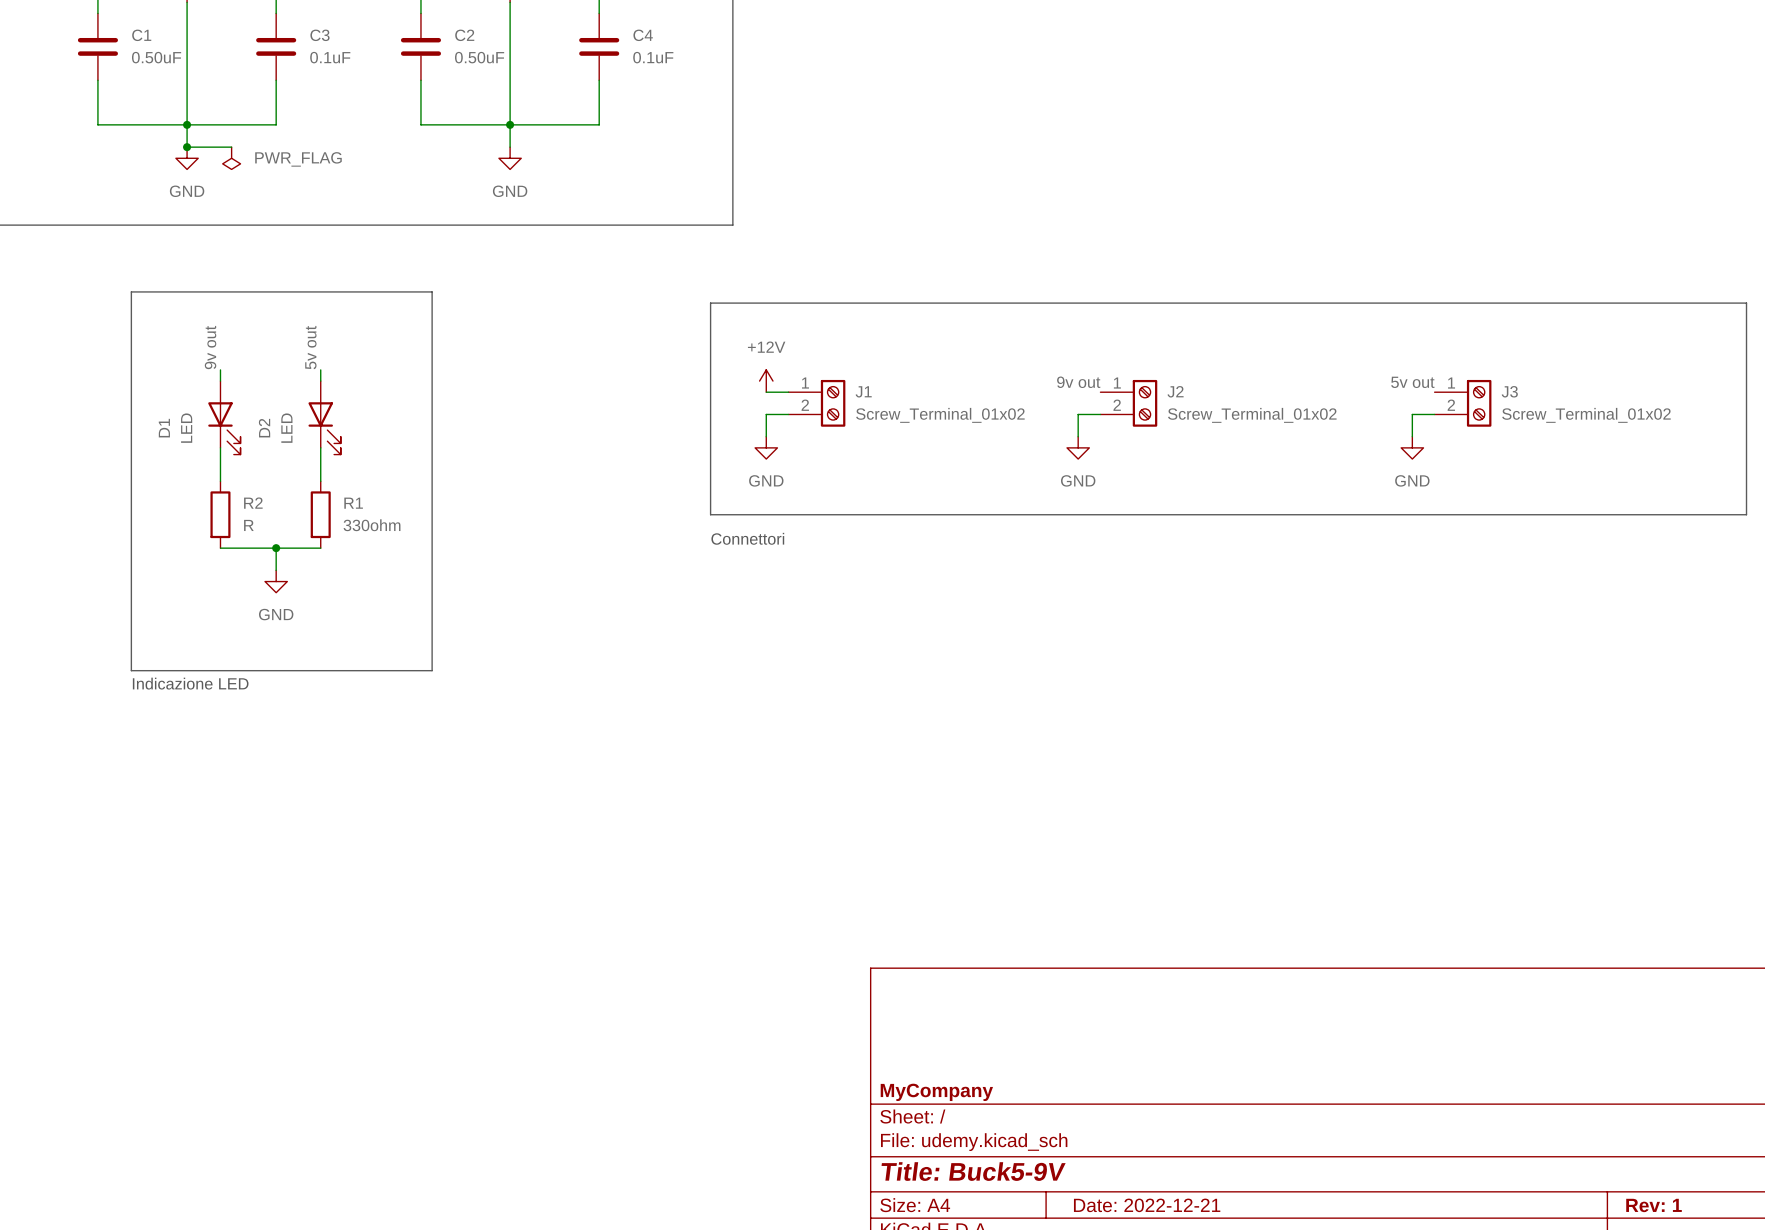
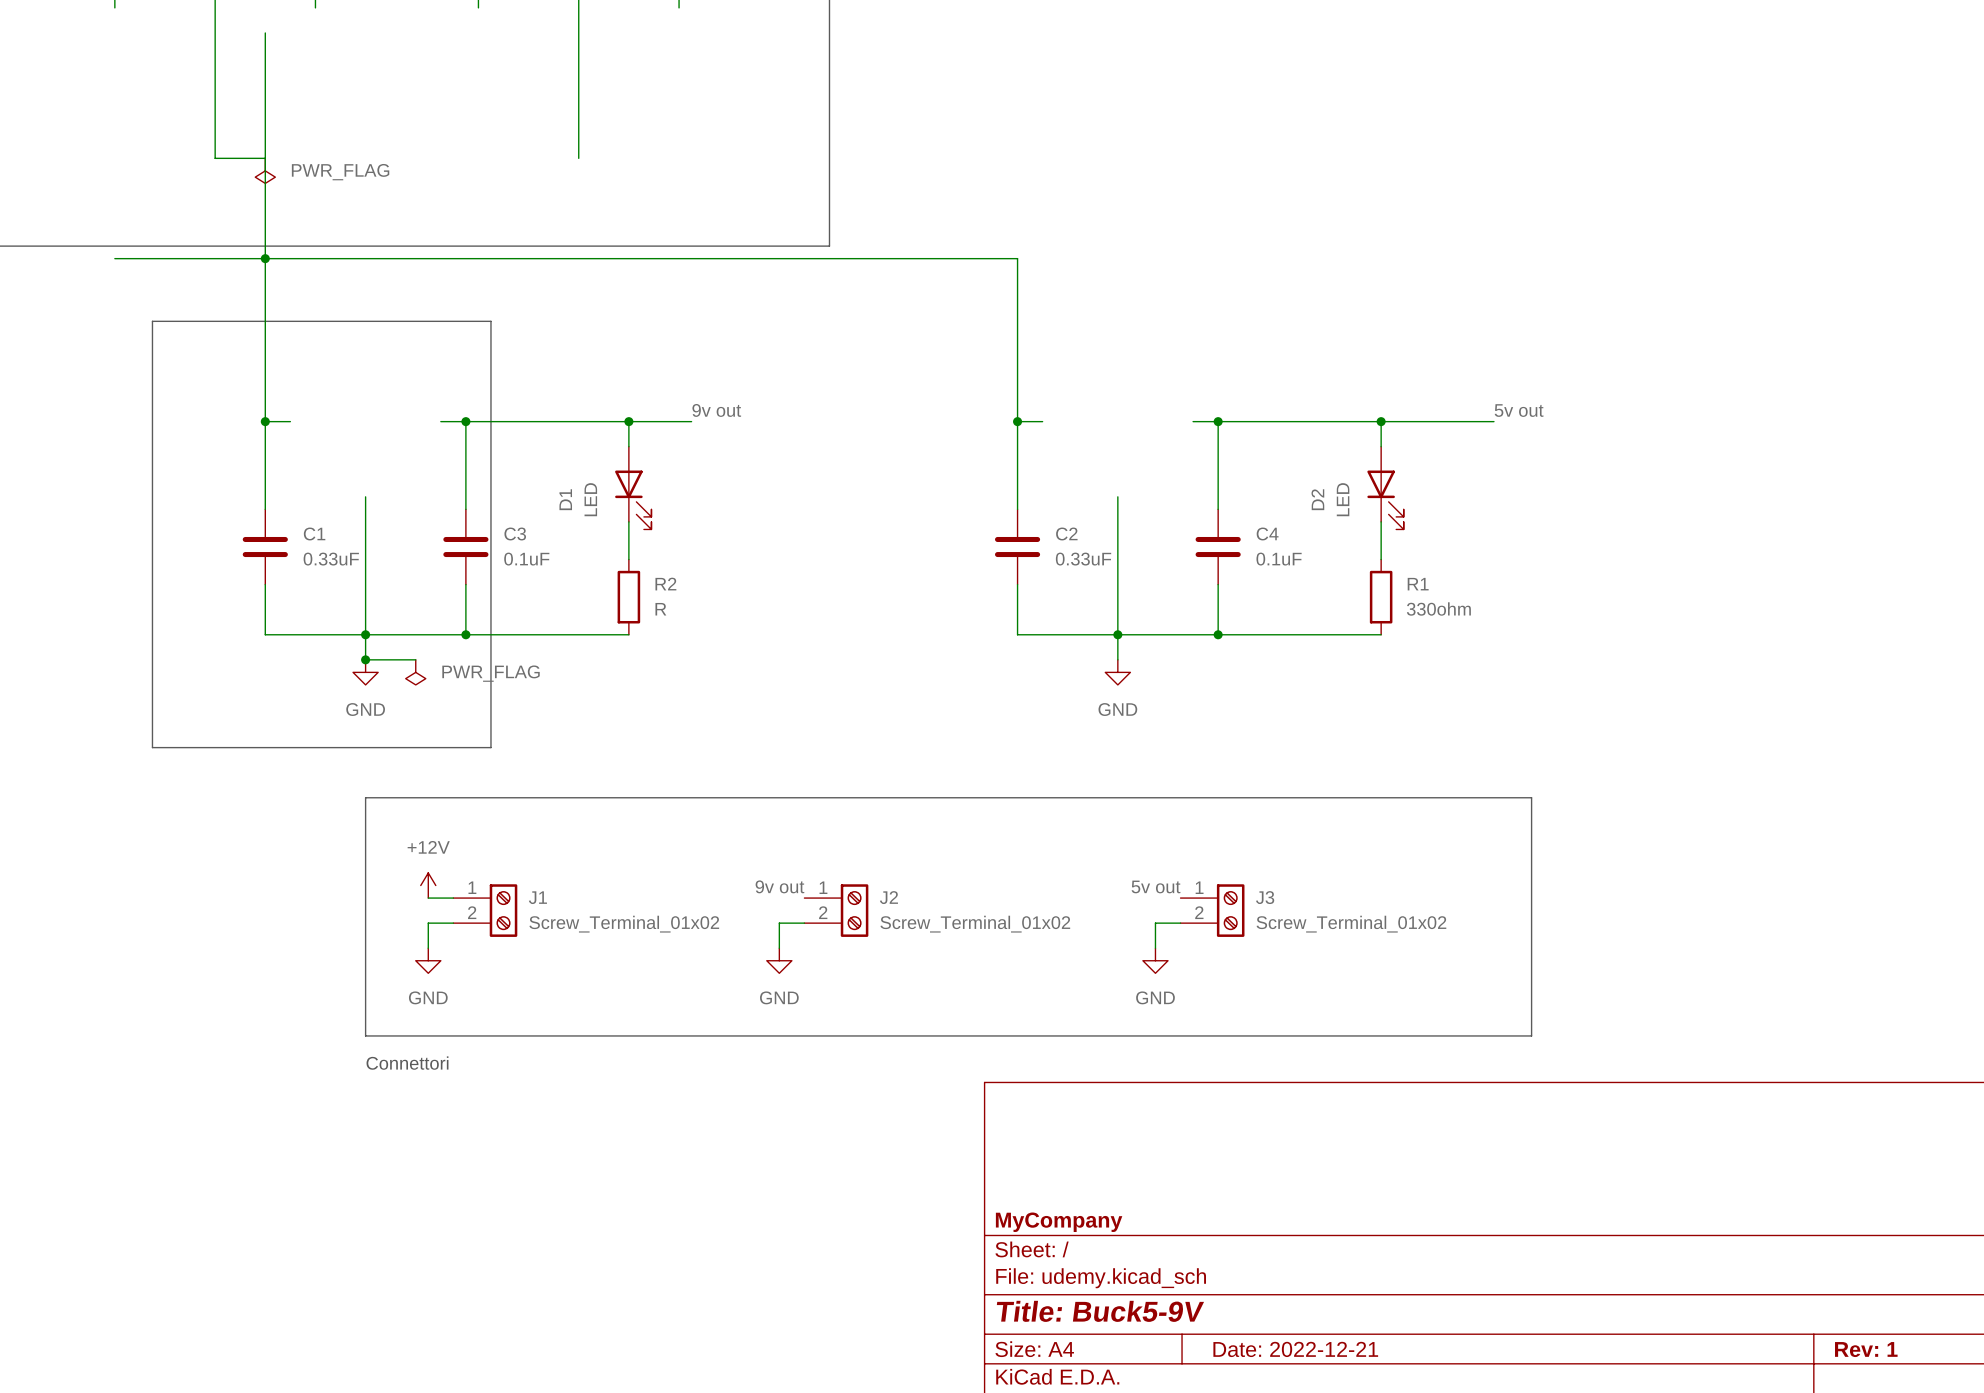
wire: none -> (265, 32) (265, 509)
C1 position: (97, 46) -> (265, 547)
C3 position: (276, 46) -> (465, 547)
C2 position: (420, 46) -> (1017, 547)
C4 position: (599, 46) -> (1218, 547)
C1 value: 0.50uF (156, 57) -> 0.33uF (331, 559)
C2 value: 0.50uF (479, 57) -> 0.33uF (1083, 559)
wire: (97, 80) (97, 124) (276, 124) (276, 80) -> none
wire: (420, 80) (420, 124) (599, 124) (599, 80) -> none
junction: (187, 124) -> none
junction: (510, 124) -> none
junction: (187, 147) -> none
power symbol: GND (187, 158) -> none
power symbol: GND (510, 158) -> none
wire: none -> (114, 258) (1017, 258) (1017, 509)
junction: none -> (265, 258)
line: (710, 303) (1746, 303) (1746, 514) (710, 514) (710, 303) -> none
label: 9v out (210, 347) -> none
label: 5v out (310, 347) -> none
wire: (220, 369) (220, 381) -> none
wire: (320, 369) (320, 381) -> none
label: none -> 9v out (716, 410)
wire: none -> (265, 421) (290, 421)
junction: none -> (265, 421)
wire: none -> (440, 421) (691, 421)
wire: none -> (465, 421) (465, 509)
junction: none -> (465, 421)
wire: none -> (628, 421) (628, 446)
junction: none -> (628, 421)
power symbol: +12V (766, 381) -> none
junction: none -> (1017, 421)
wire: none -> (1193, 421) (1493, 421)
junction: none -> (1218, 421)
wire: none -> (1381, 421) (1381, 446)
junction: none -> (1381, 421)
label: 9v out (1078, 382) -> none
label position: 5v out (1412, 382) -> 5v out (1519, 410)
wire: (766, 392) (788, 392) -> (1017, 421) (1042, 421)
J1 position: (816, 403) -> (485, 910)
J2 position: (1128, 403) -> (836, 910)
J3 position: (1463, 403) -> (1212, 910)
wire: (788, 414) (766, 414) (766, 436) -> none
wire: (1078, 414) (1100, 414) -> (1218, 459) (1218, 421)
wire: (1434, 414) (1412, 414) (1412, 436) -> none
D1 position: (224, 417) -> (633, 488)
D2 position: (324, 417) -> (1385, 488)
wire: (220, 447) (220, 481) -> none
power symbol: GND (766, 447) -> none
wire: none -> (1117, 496) (1117, 659)
power symbol: GND (1078, 447) -> none
power symbol: GND (1412, 447) -> none
wire: none -> (628, 521) (628, 559)
wire: none -> (1381, 521) (1381, 559)
wire: none -> (365, 534) (365, 659) (415, 659)
R2 position: (220, 514) -> (628, 597)
R1 position: (320, 514) -> (1381, 597)
wire: none -> (265, 584) (265, 634) (628, 634)
wire: none -> (465, 584) (465, 634)
wire: none -> (1017, 584) (1017, 634) (1381, 634)
wire: none -> (1218, 584) (1218, 634)
text: Connettori (747, 538) -> none
wire: (220, 548) (320, 548) -> none
wire: (276, 548) (276, 570) -> none
junction: (276, 548) -> none
junction: none -> (365, 634)
junction: none -> (465, 634)
junction: none -> (1117, 634)
junction: none -> (1218, 634)
power symbol position: GND (276, 581) -> GND (365, 672)
junction: none -> (365, 659)
power symbol: none -> PWR_FLAG (415, 672)
power symbol: none -> GND (1117, 672)
text: Indicazione LED (190, 683) -> none
line: none -> (365, 797) (1531, 797) (1531, 1035) (365, 1035) (365, 797)
power symbol: none -> +12V (428, 885)
label: none -> 9v out (779, 886)
label: none -> 5v out (1156, 886)
wire: none -> (428, 898) (453, 898)
wire: none -> (453, 923) (428, 923) (428, 948)
wire: none -> (804, 923) (779, 923) (779, 948)
wire: none -> (1180, 923) (1155, 923) (1155, 948)
power symbol: none -> GND (428, 960)
power symbol: none -> GND (779, 960)
power symbol: none -> GND (1155, 960)
text: none -> Connettori (407, 1063)

